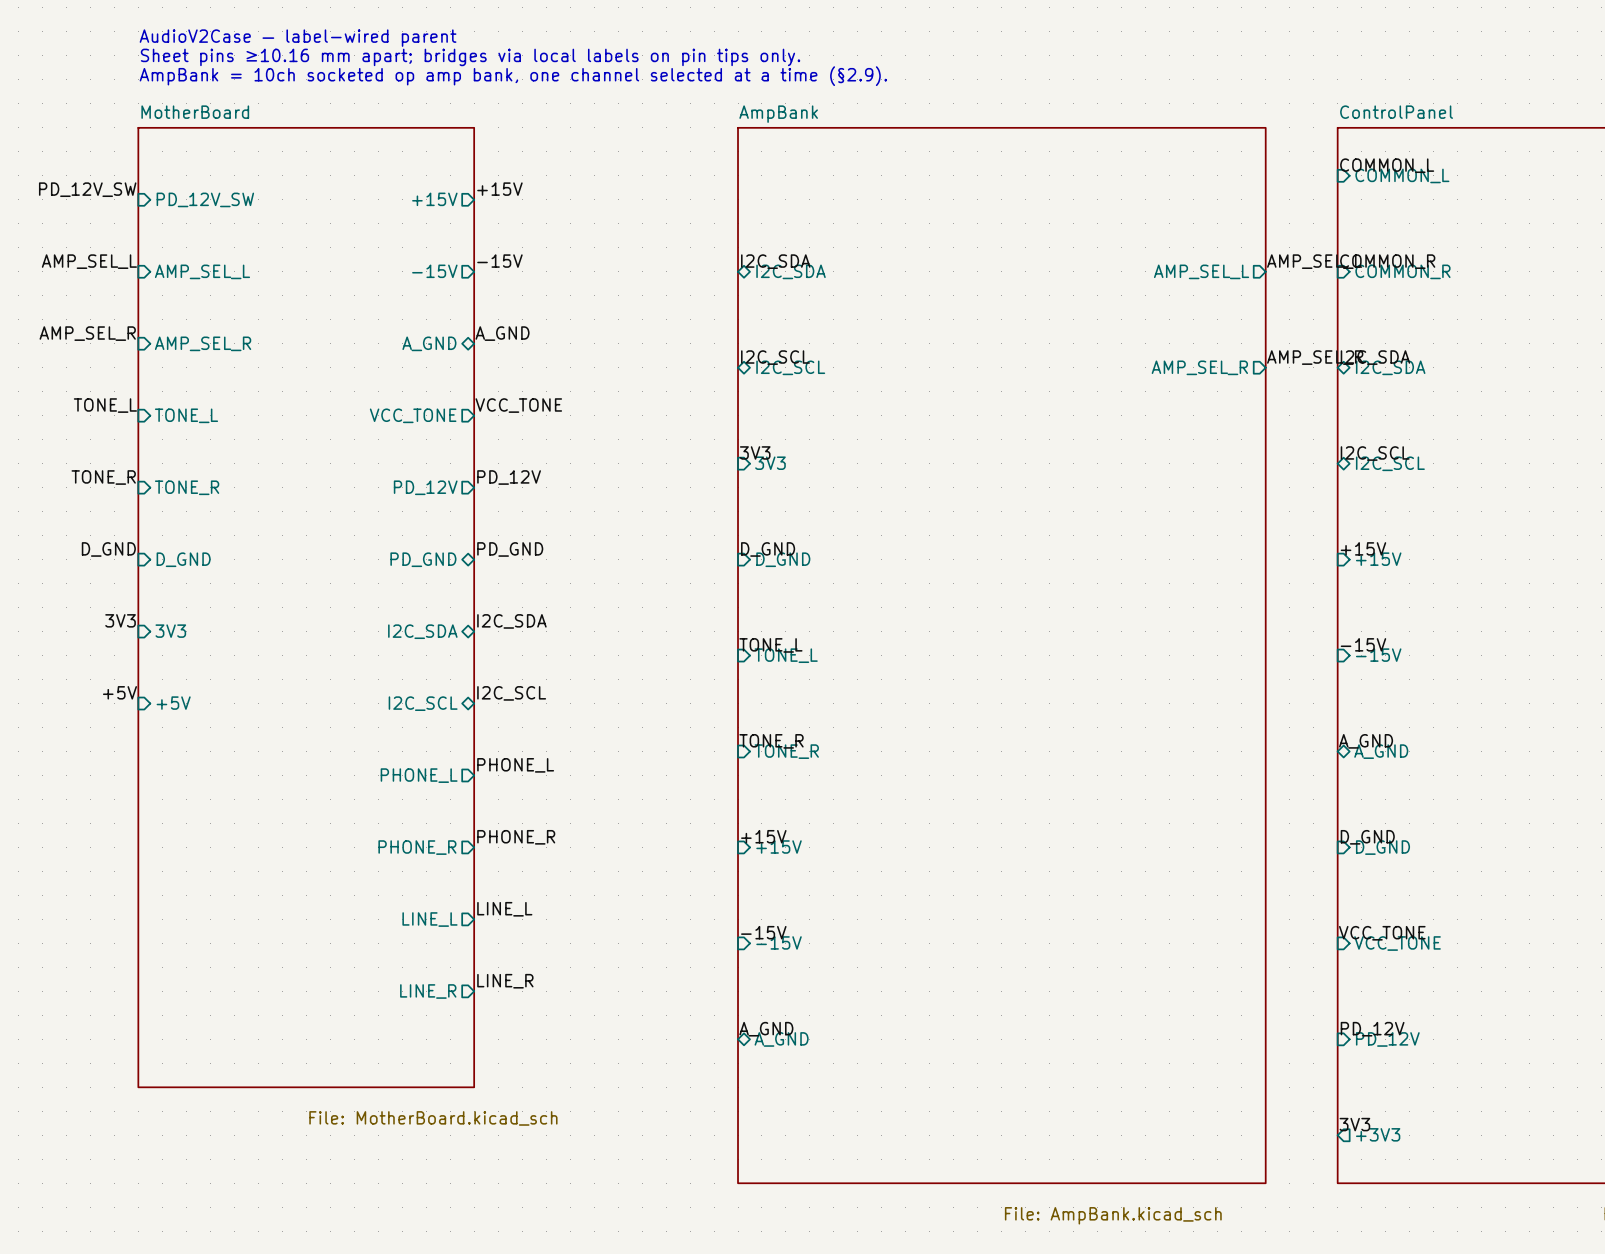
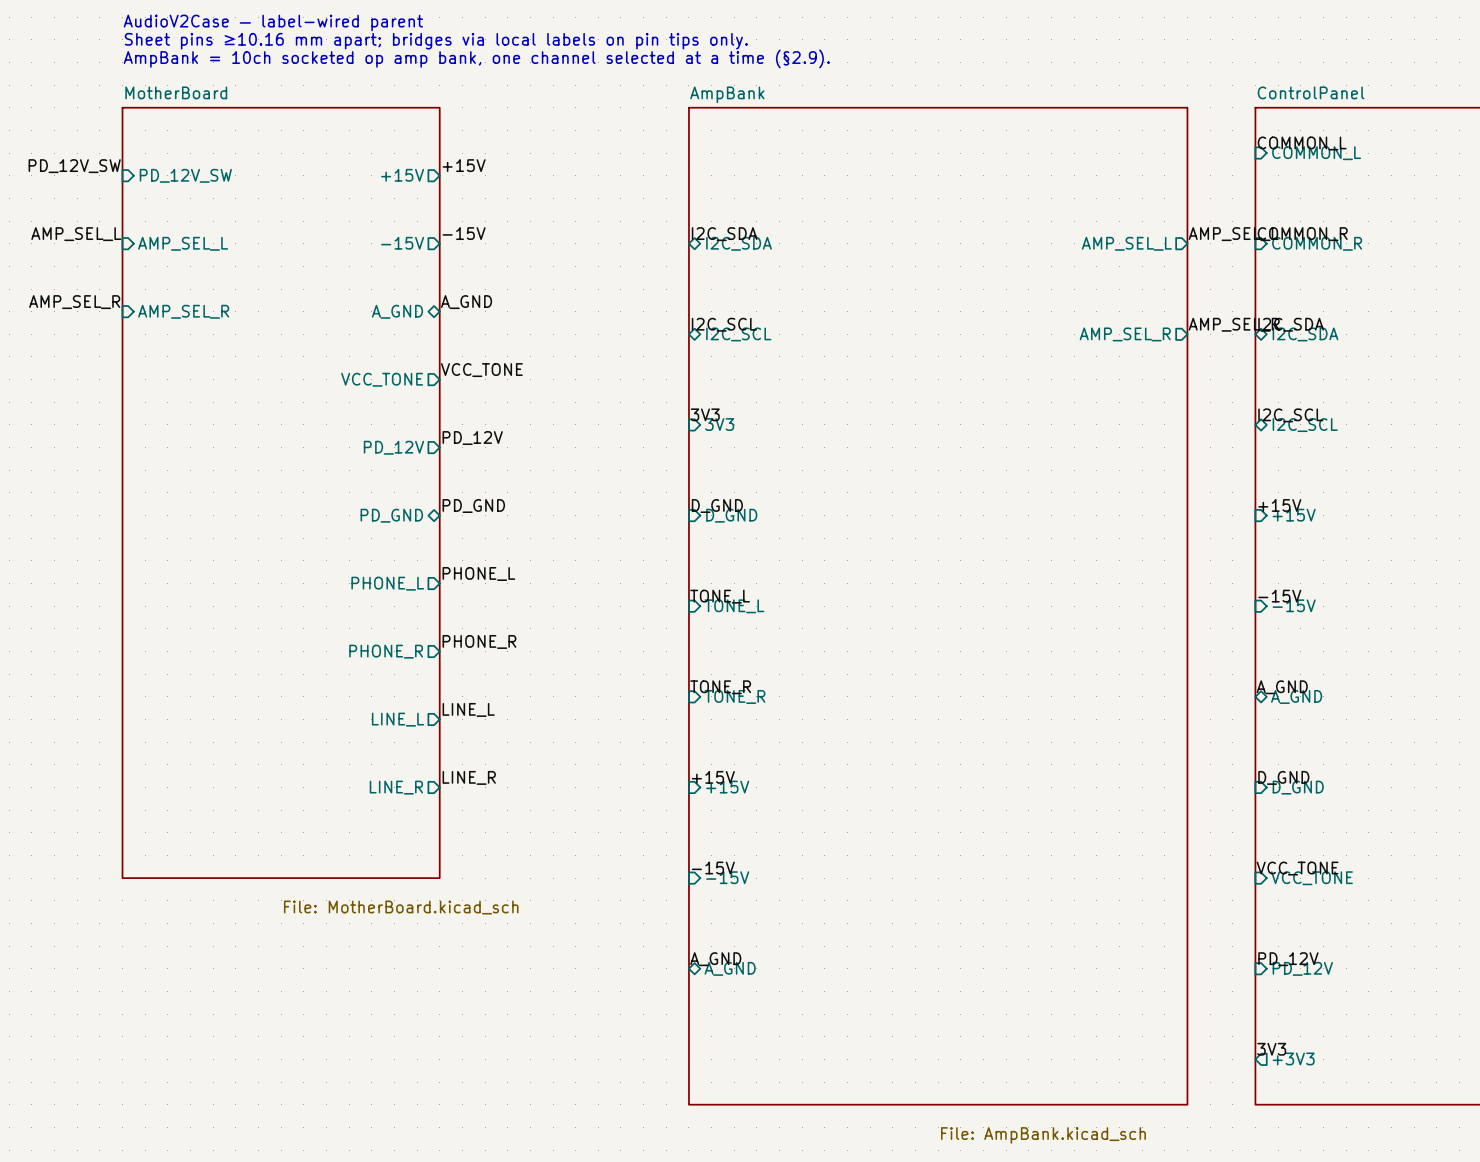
label: TONE_L (105, 405) -> none
sheet pin: TONE_L (186, 415) -> none
label: TONE_R (103, 477) -> none
sheet pin: TONE_R (187, 487) -> none
sheet MotherBoard: none -> File: MotherBoard.kicad_sch (281, 492)
label: D_GND (108, 549) -> none
sheet pin: D_GND (183, 559) -> none
sheet MotherBoard: File: MotherBoard.kicad_sch (306, 607) -> none
label: 3V3 (120, 620) -> none
label: I2C_SDA (511, 621) -> PHONE_L (478, 573)
sheet pin: 3V3 (170, 631) -> none
sheet pin shape: bidirectional (422, 631) -> output (387, 583)
sheet pin: I2C_SDA (422, 631) -> PHONE_L (387, 583)
label: +5V (119, 692) -> none
label: I2C_SCL (511, 693) -> PHONE_R (479, 641)
sheet pin: +5V (173, 703) -> none
sheet pin shape: bidirectional (423, 703) -> output (386, 651)
sheet pin: I2C_SCL (423, 703) -> PHONE_R (386, 651)
label: PHONE_L (515, 765) -> LINE_L (468, 709)
sheet pin: PHONE_L (419, 775) -> LINE_L (398, 719)
label: PHONE_R (516, 837) -> LINE_R (469, 777)
sheet pin: PHONE_R (417, 847) -> LINE_R (396, 787)
label: LINE_L (504, 909) -> none
sheet pin: LINE_L (429, 919) -> none
label: LINE_R (505, 981) -> none
sheet pin: LINE_R (428, 991) -> none

